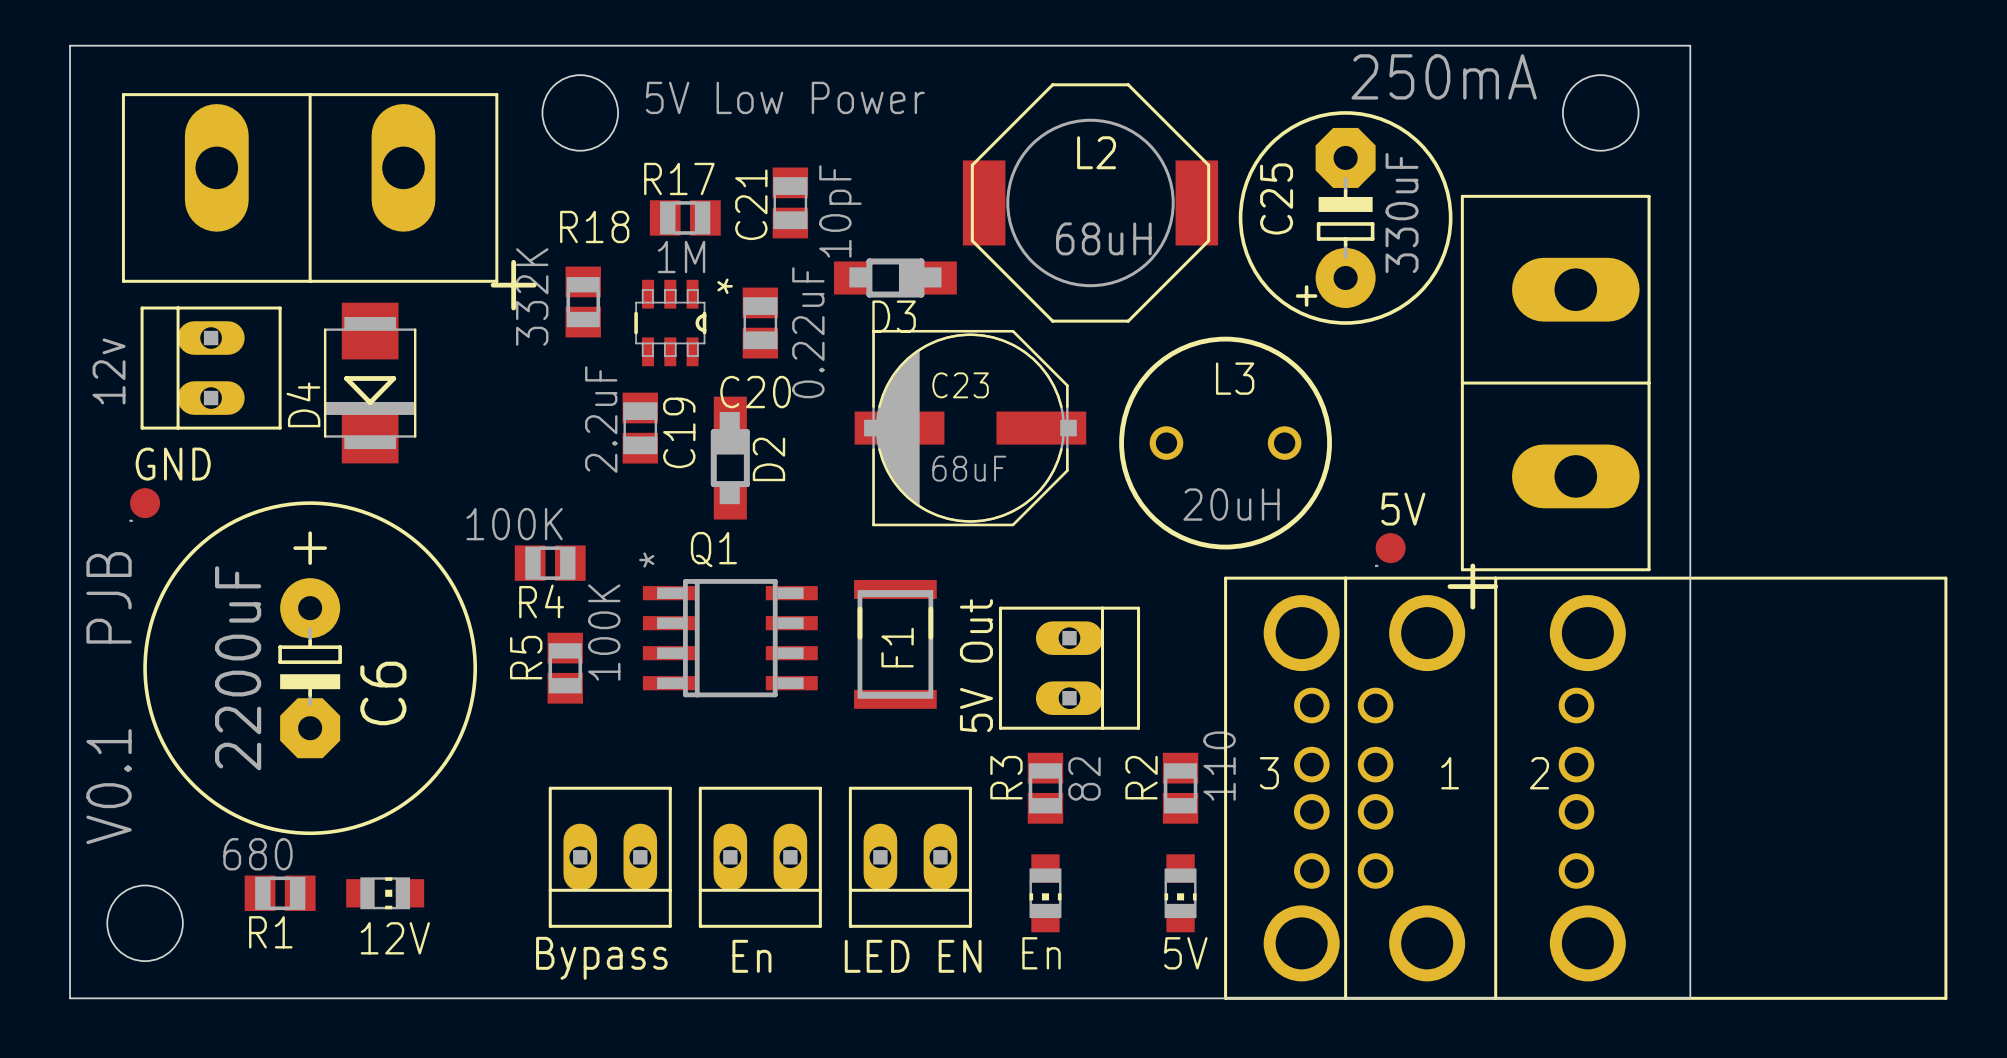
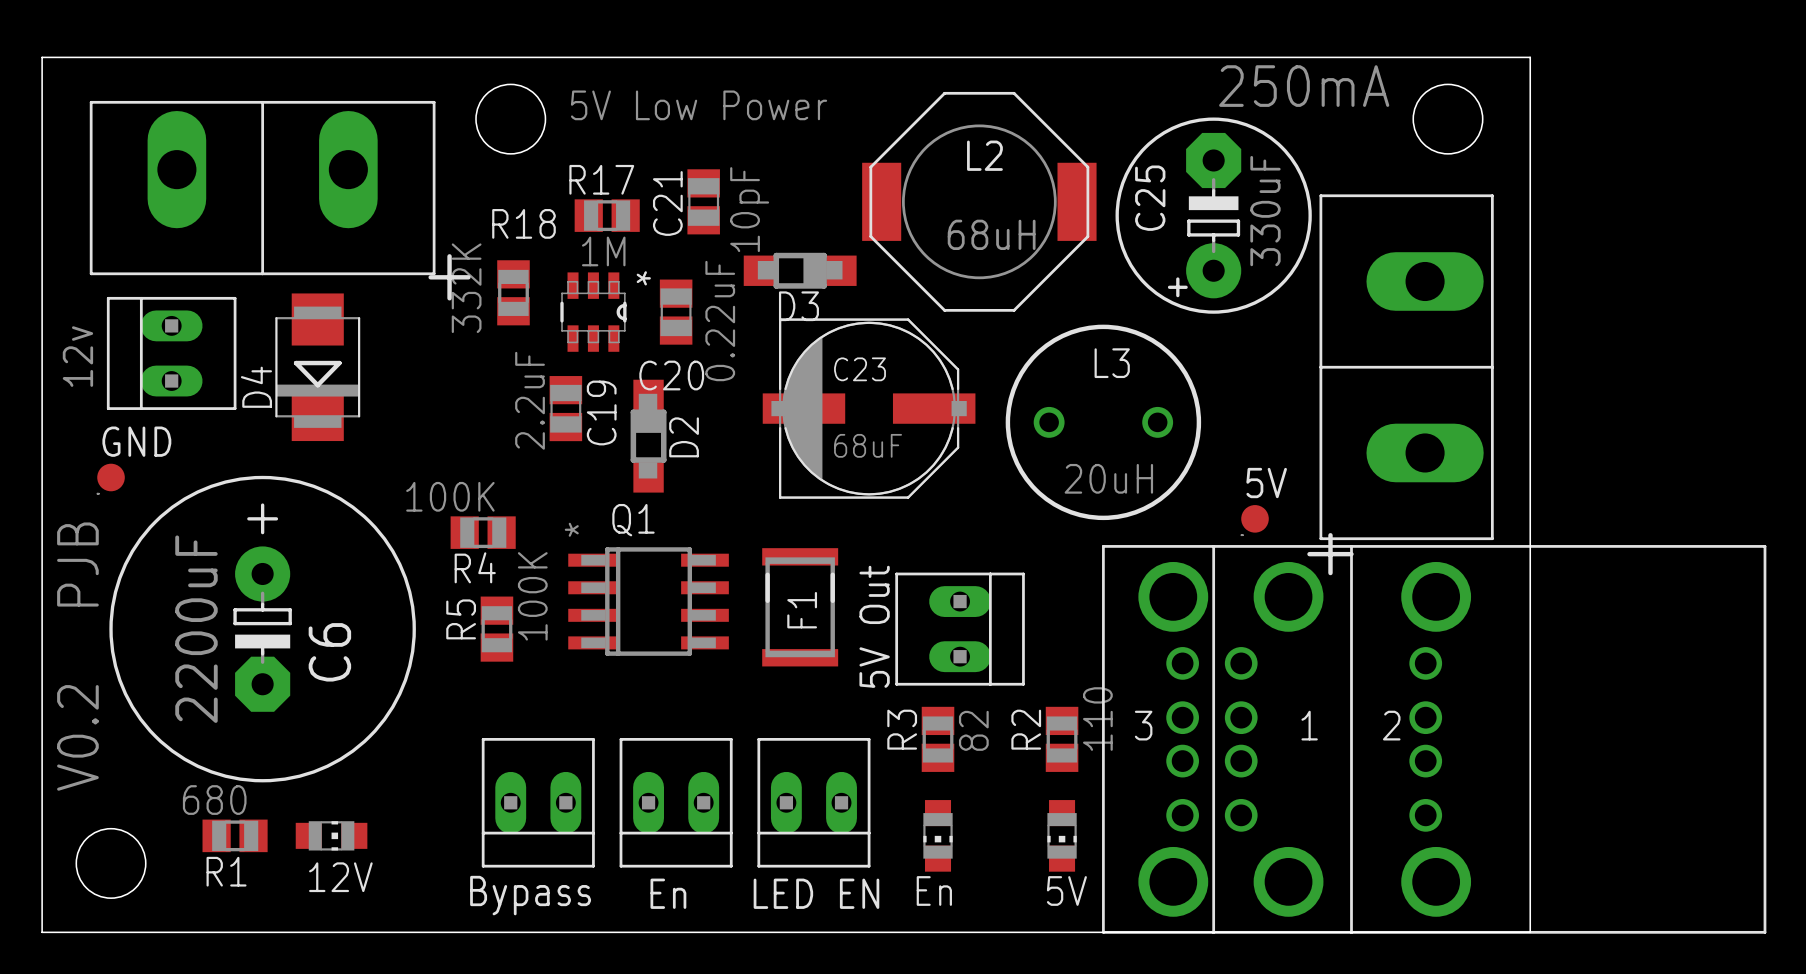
text: V0.1 (109, 786) -> V0.2 (77, 737)

